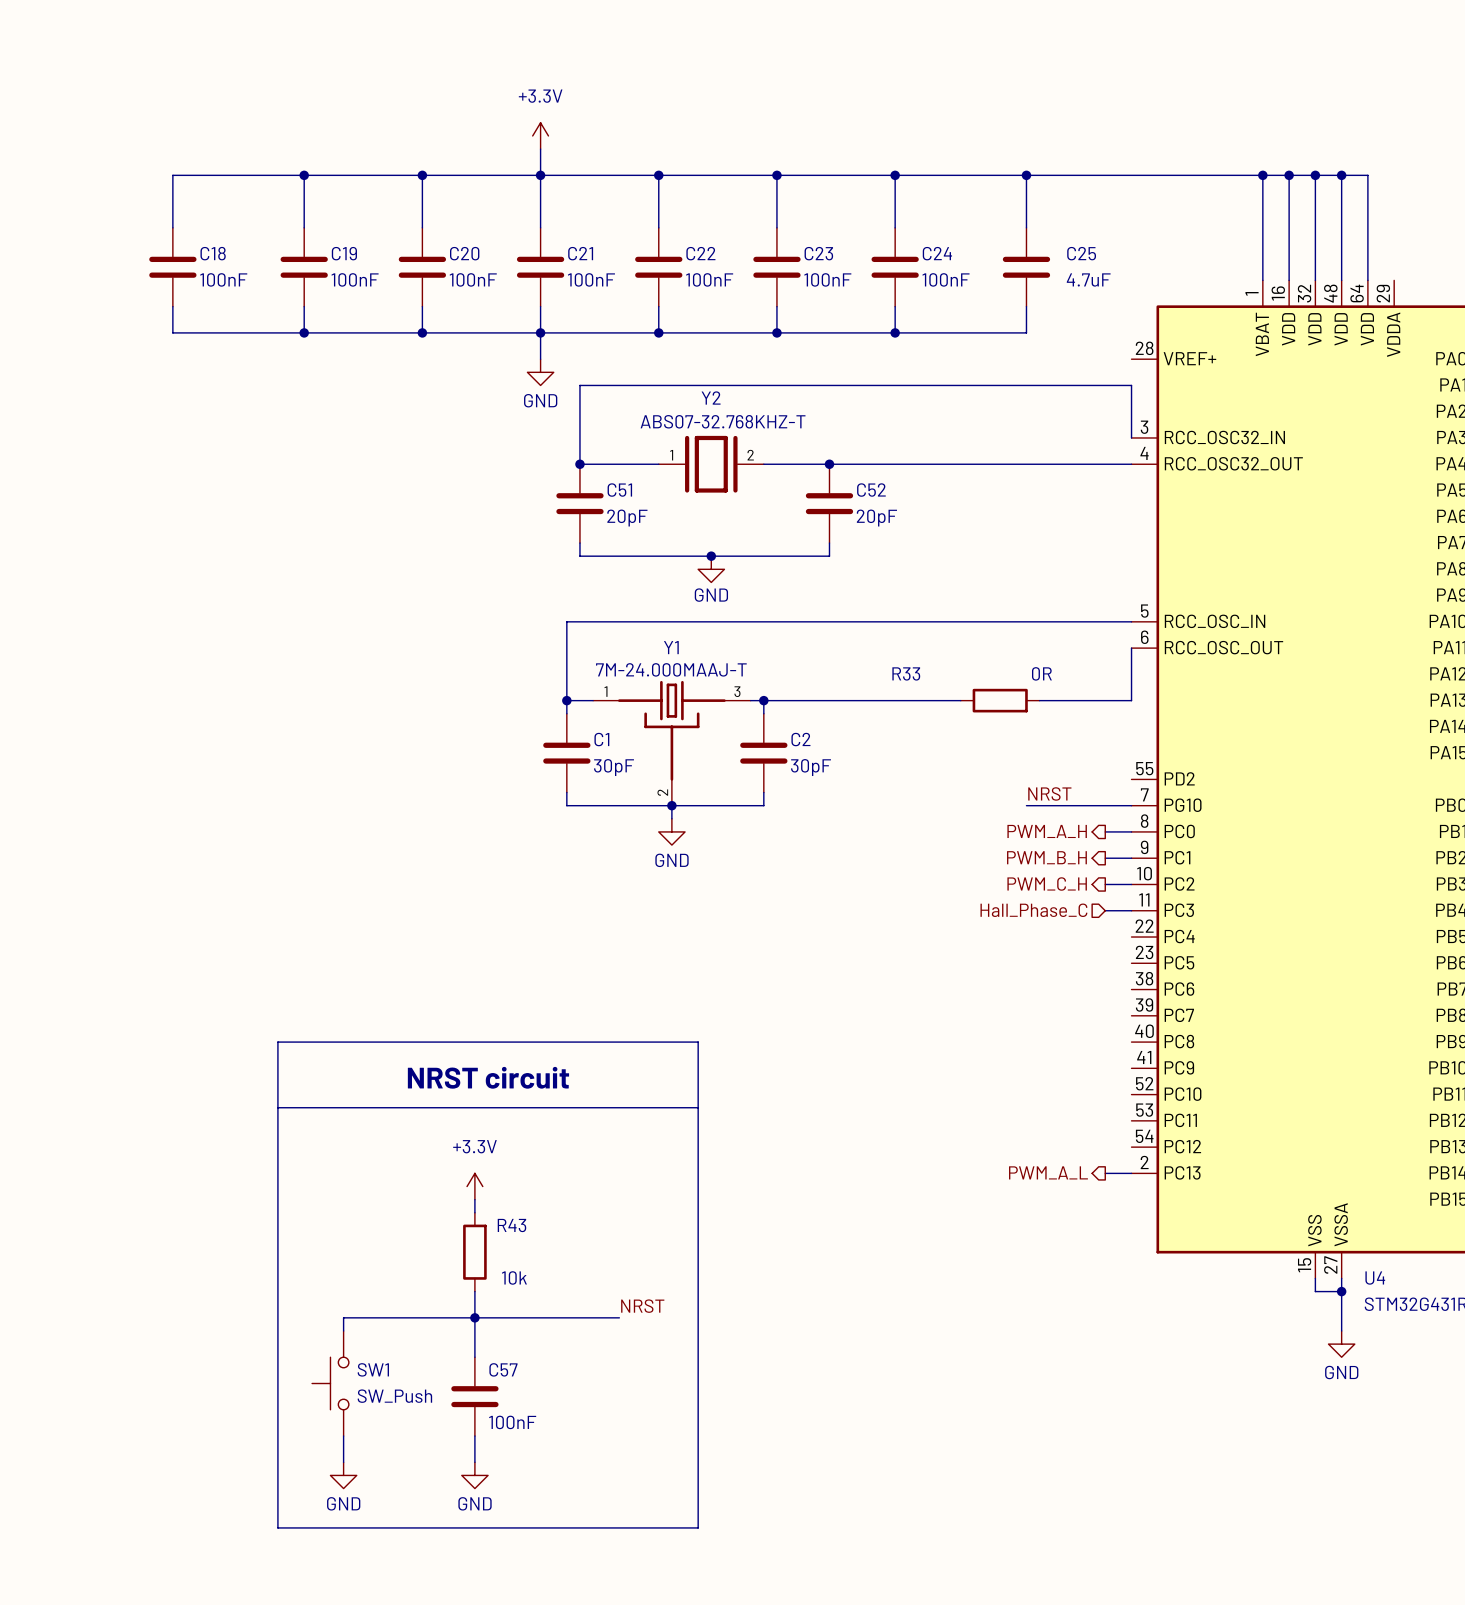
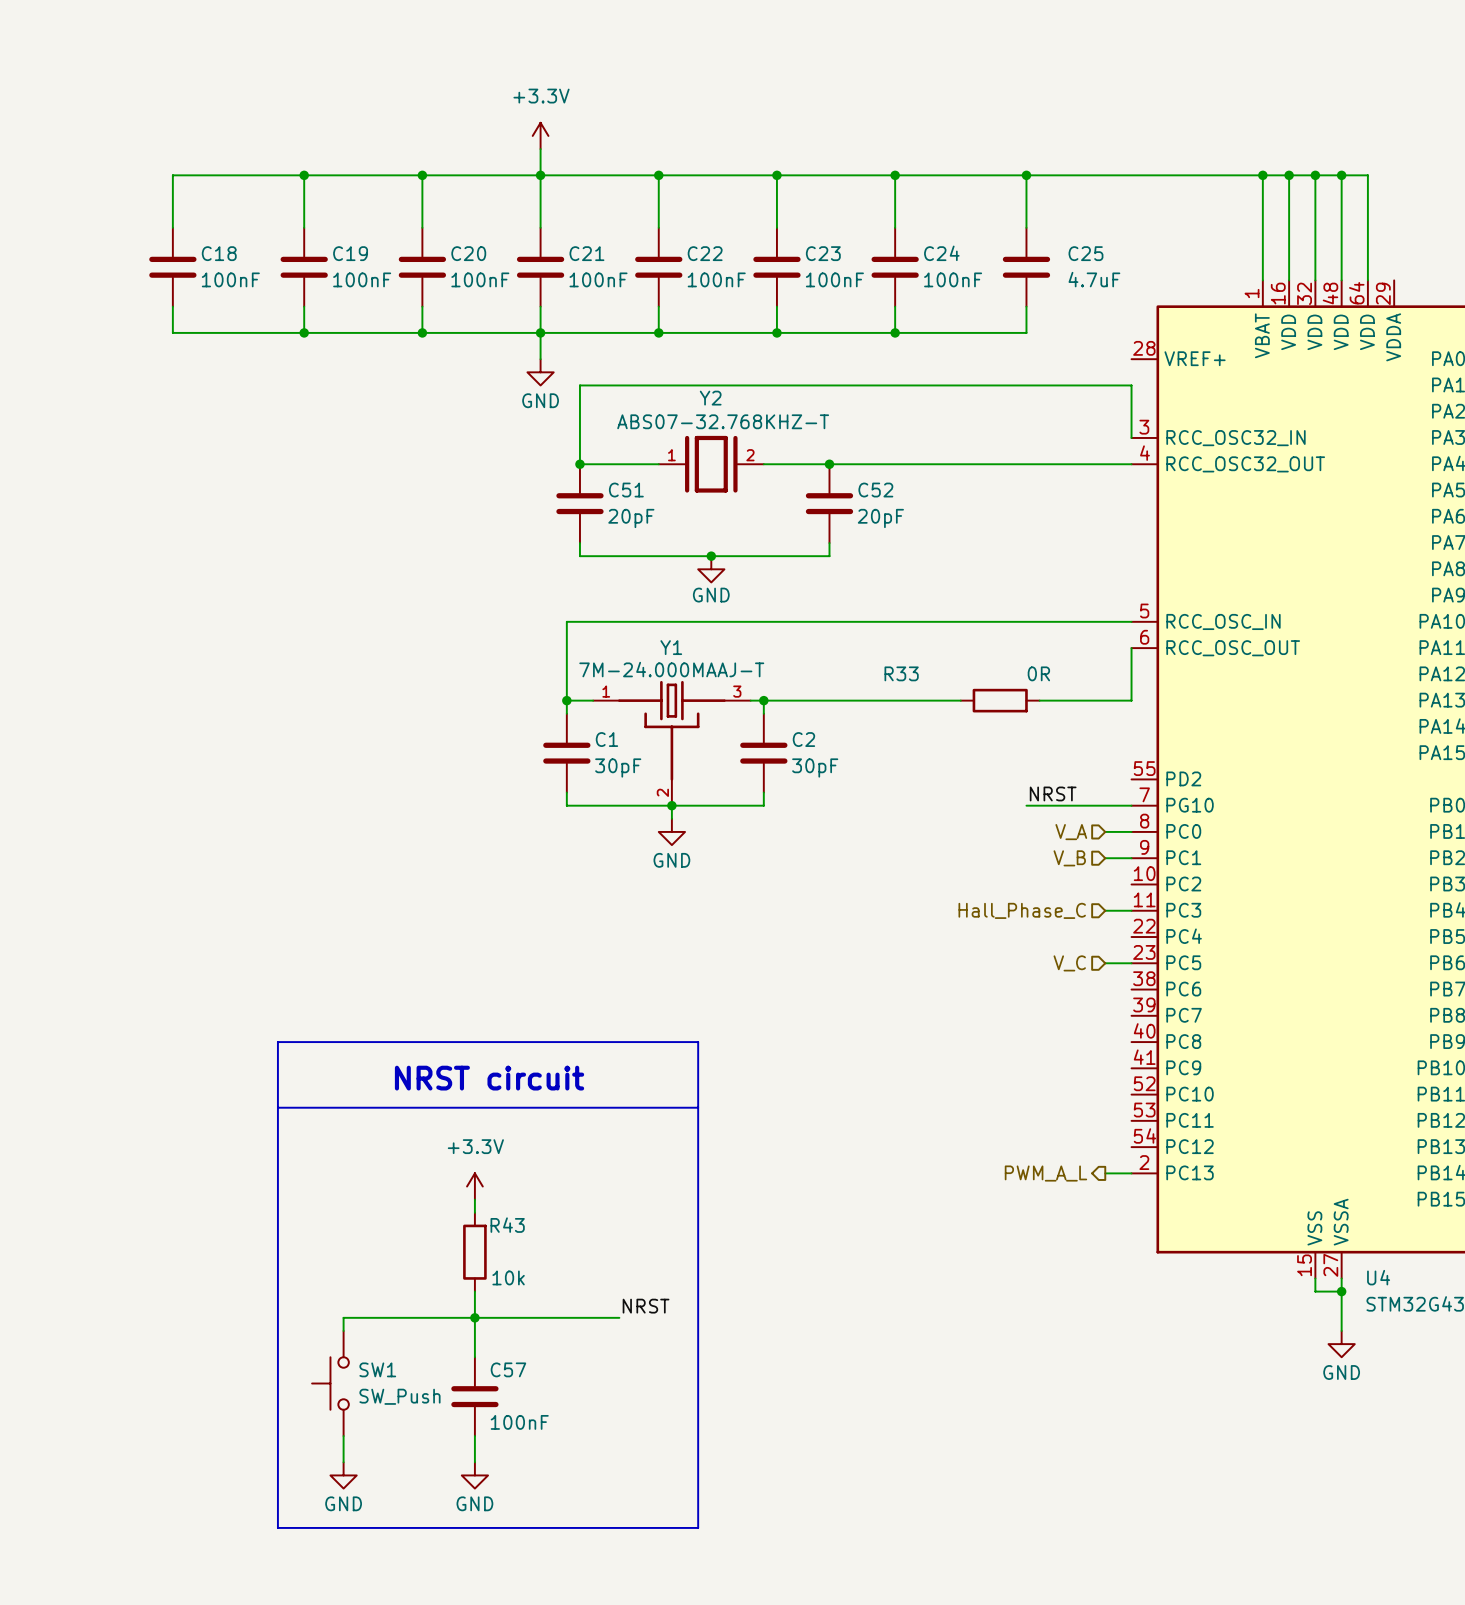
hierarchical label shape: output (1047, 831) -> input (1071, 832)
hierarchical label: PWM_A_H (1047, 831) -> V_A (1071, 832)
hierarchical label shape: output (1046, 857) -> input (1069, 858)
hierarchical label: PWM_B_H (1046, 857) -> V_B (1069, 858)
hierarchical label: PWM_C_H (1047, 884) -> none
wire: (1105, 884) (1131, 884) -> (1105, 963) (1131, 963)
hierarchical label: none -> V_C (1069, 963)

